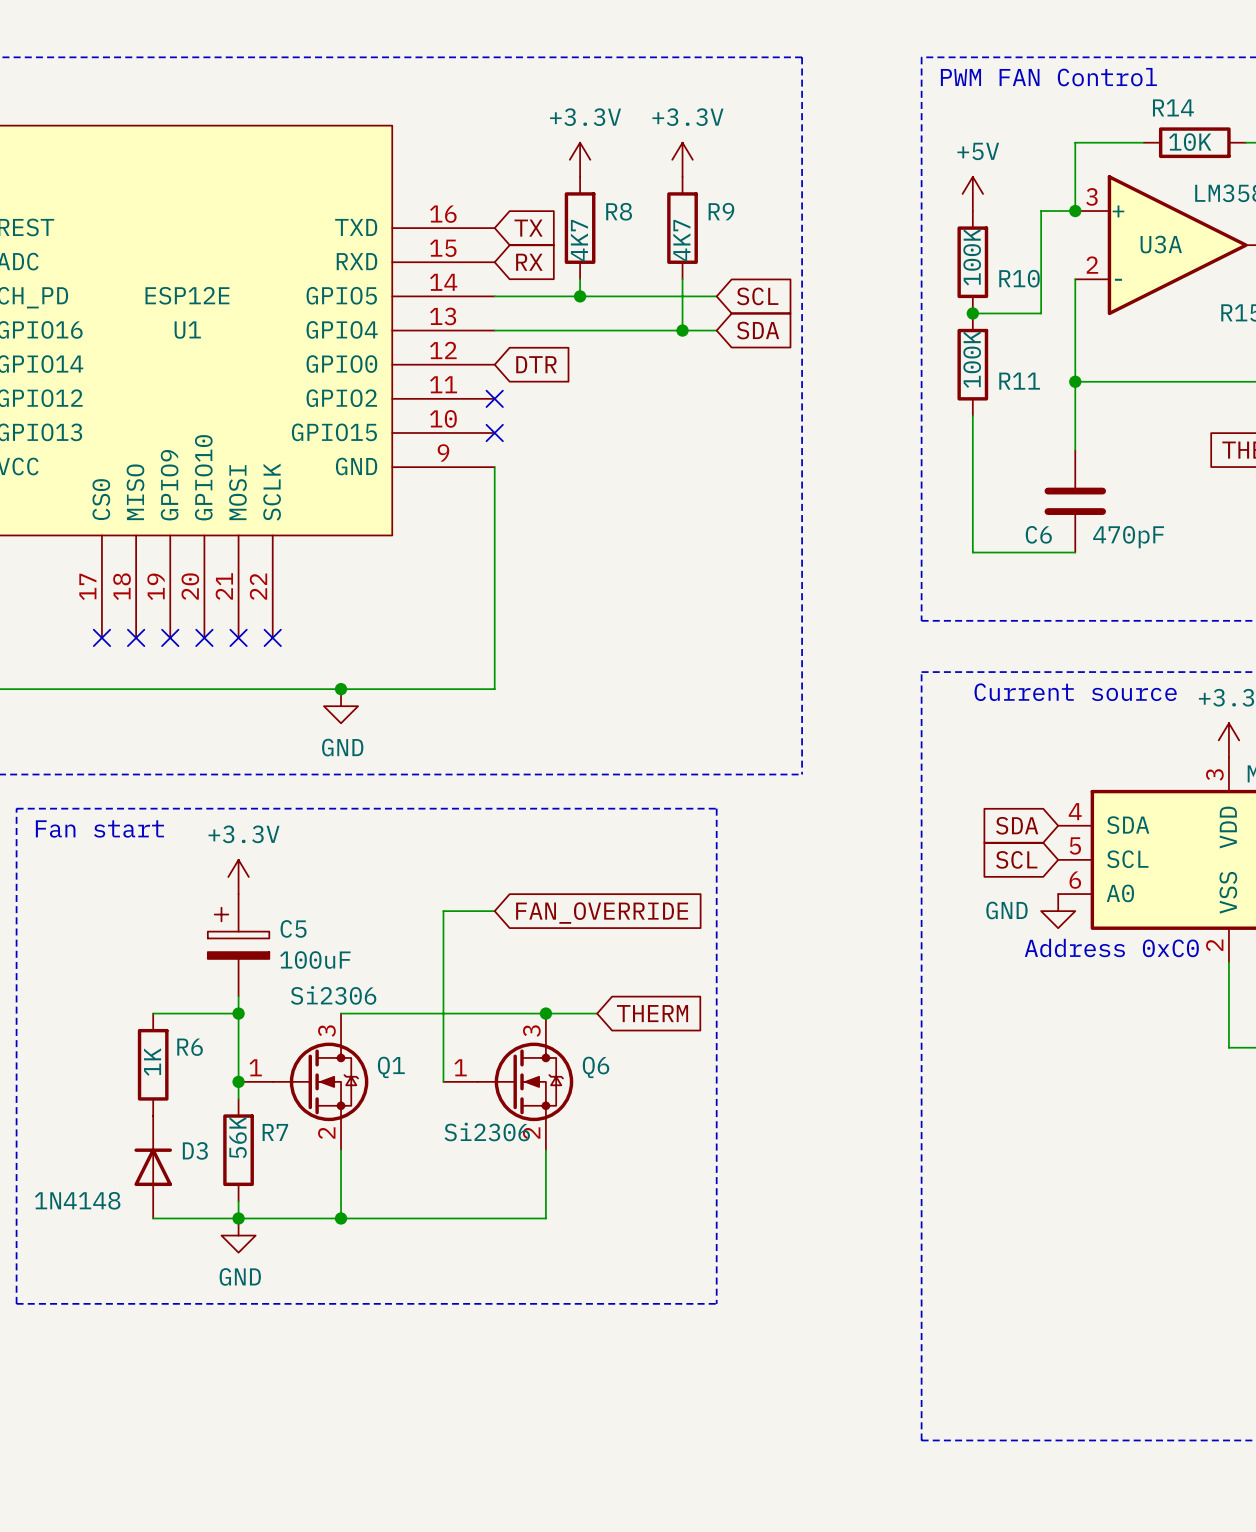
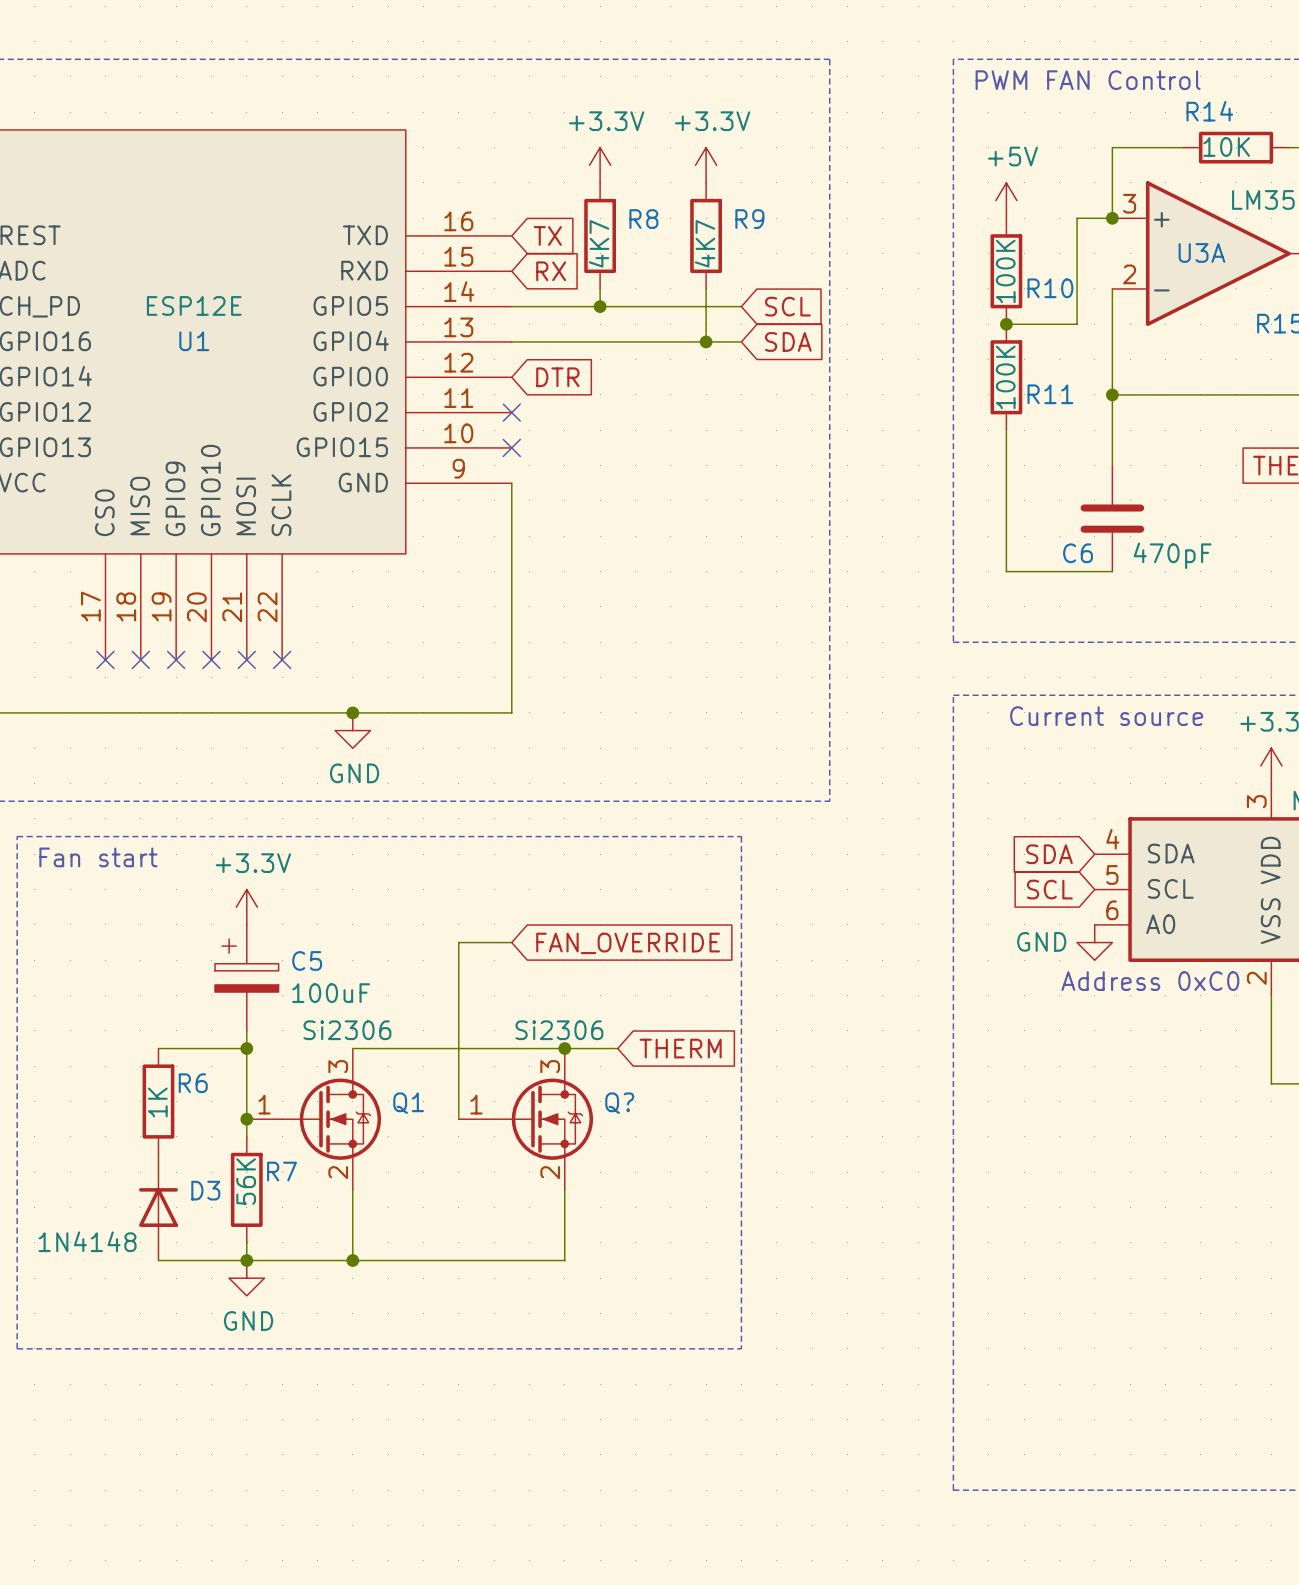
Q6 name: Q6 (596, 1067) -> Q? (619, 1103)
Q6 value position: Si2306 (487, 1132) -> Si2306 (559, 1030)

